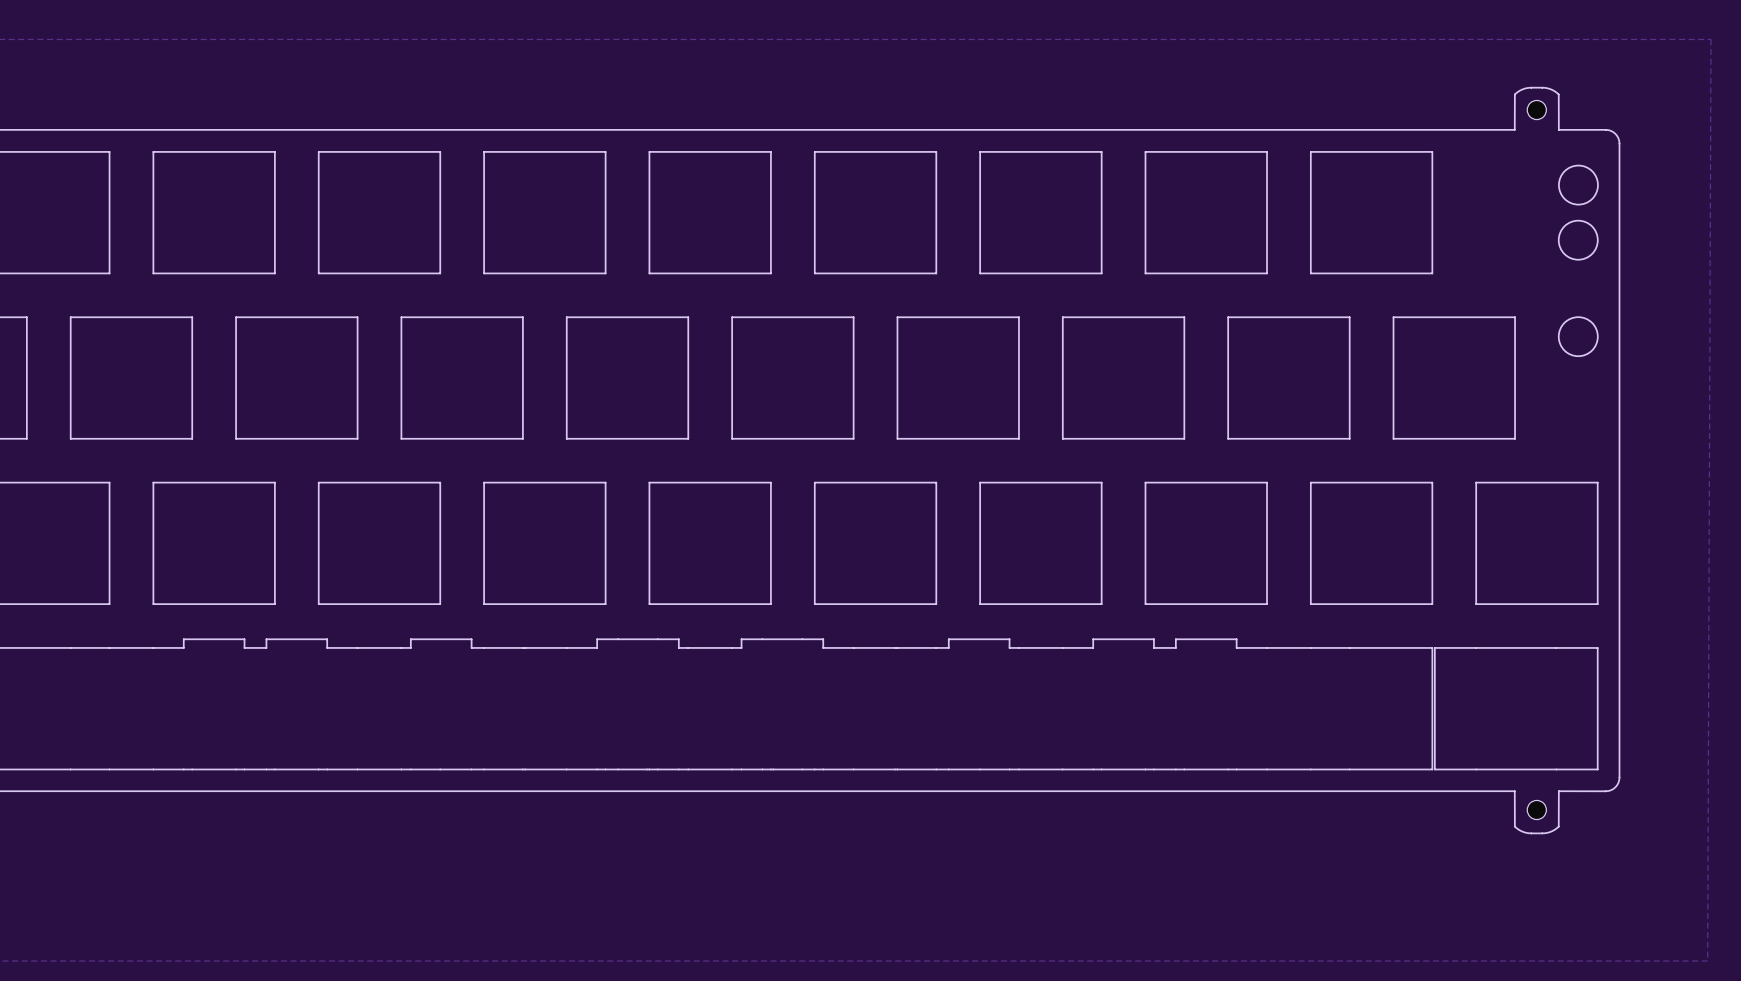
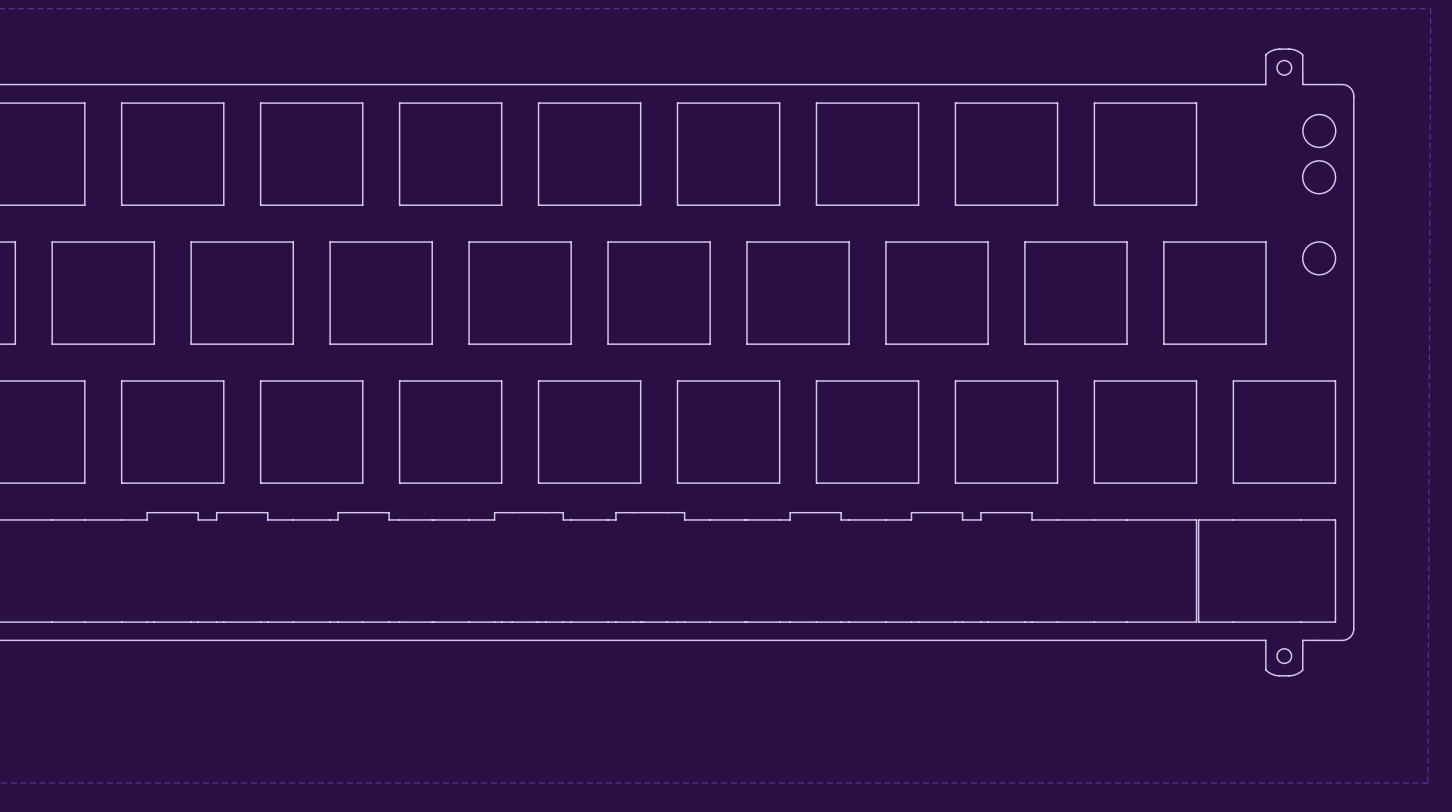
round board edge: none -> [1276, 59, 1293, 76]
part: (1536, 110) -> none
round board edge: none -> [1276, 648, 1293, 665]
part: (1536, 810) -> none

